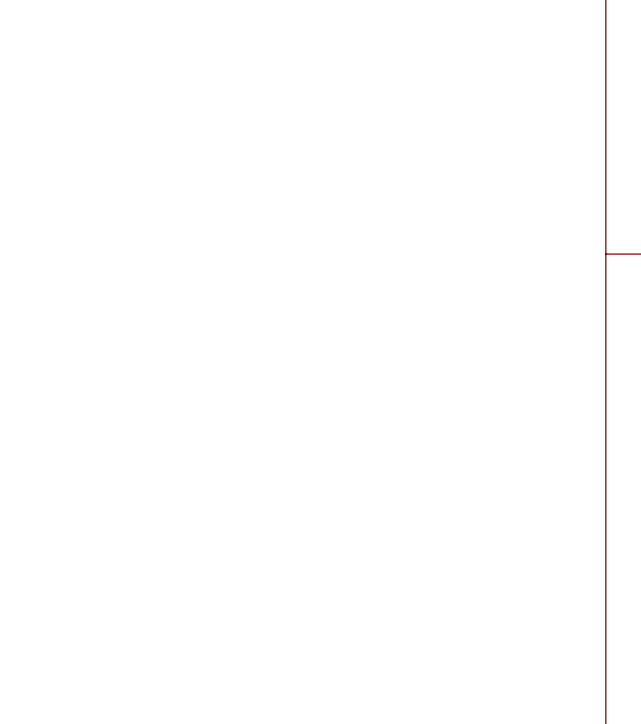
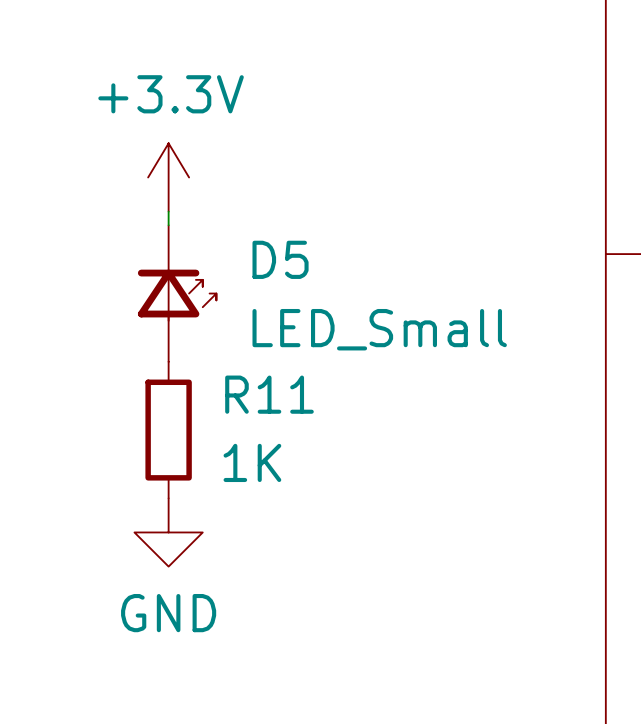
power symbol: none -> +3.3V (168, 177)
wire: none -> (168, 211) (168, 225)
D5: none -> LED_Small (177, 293)
R11: none -> 1K (168, 430)
power symbol: none -> GND (168, 532)

